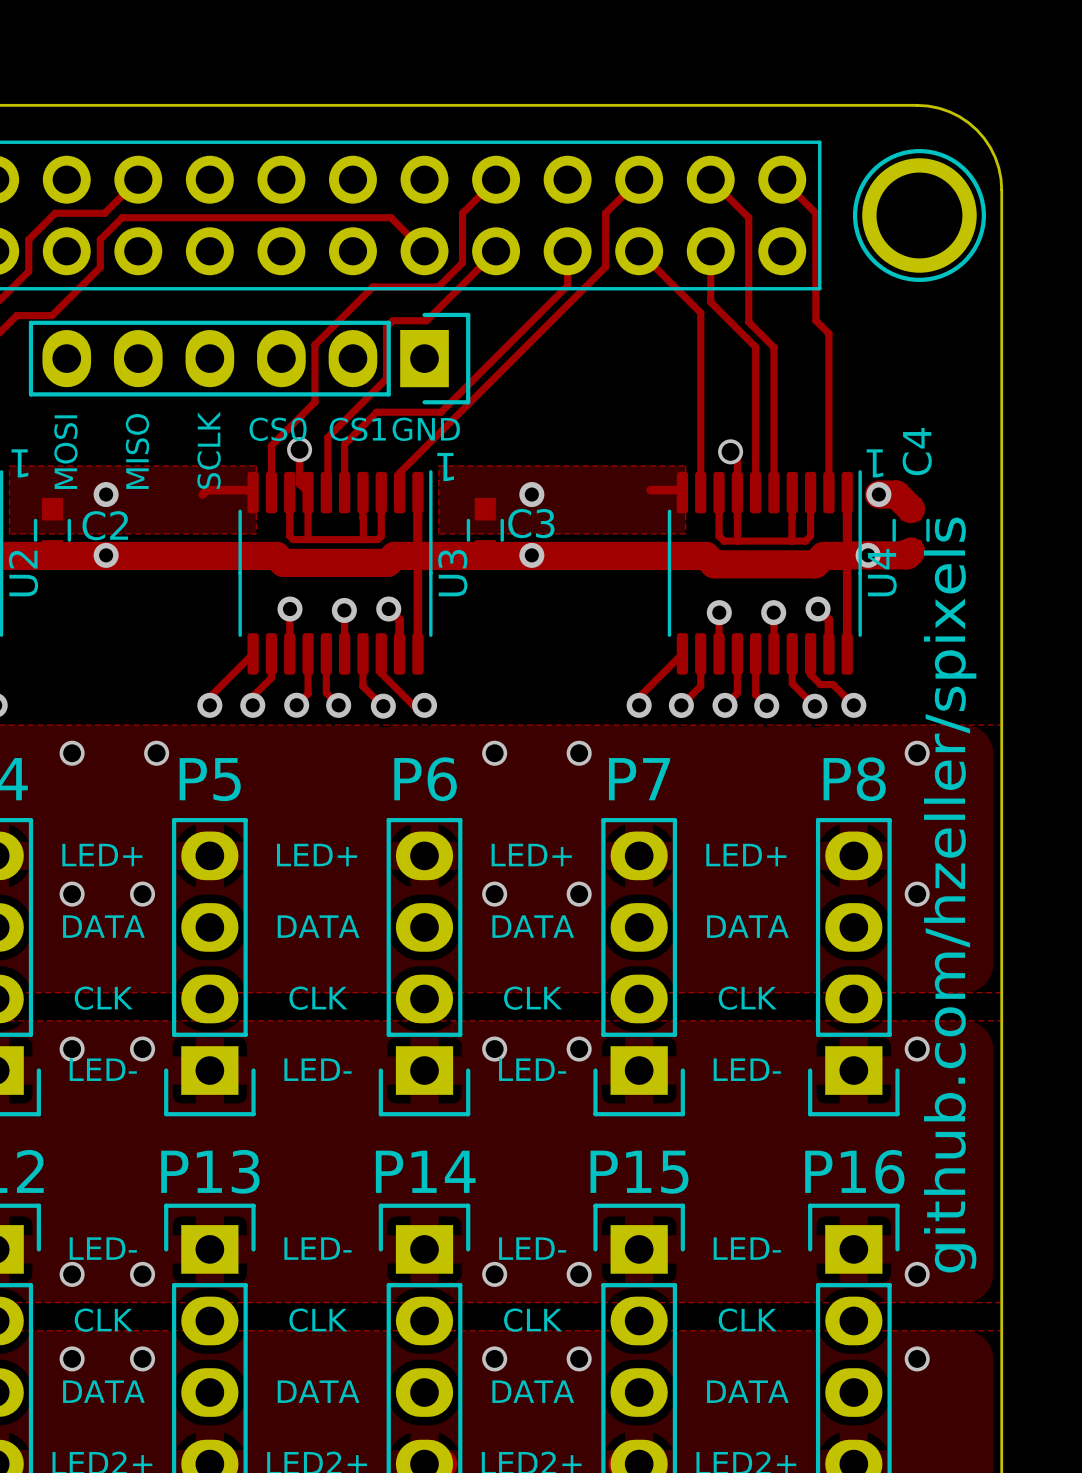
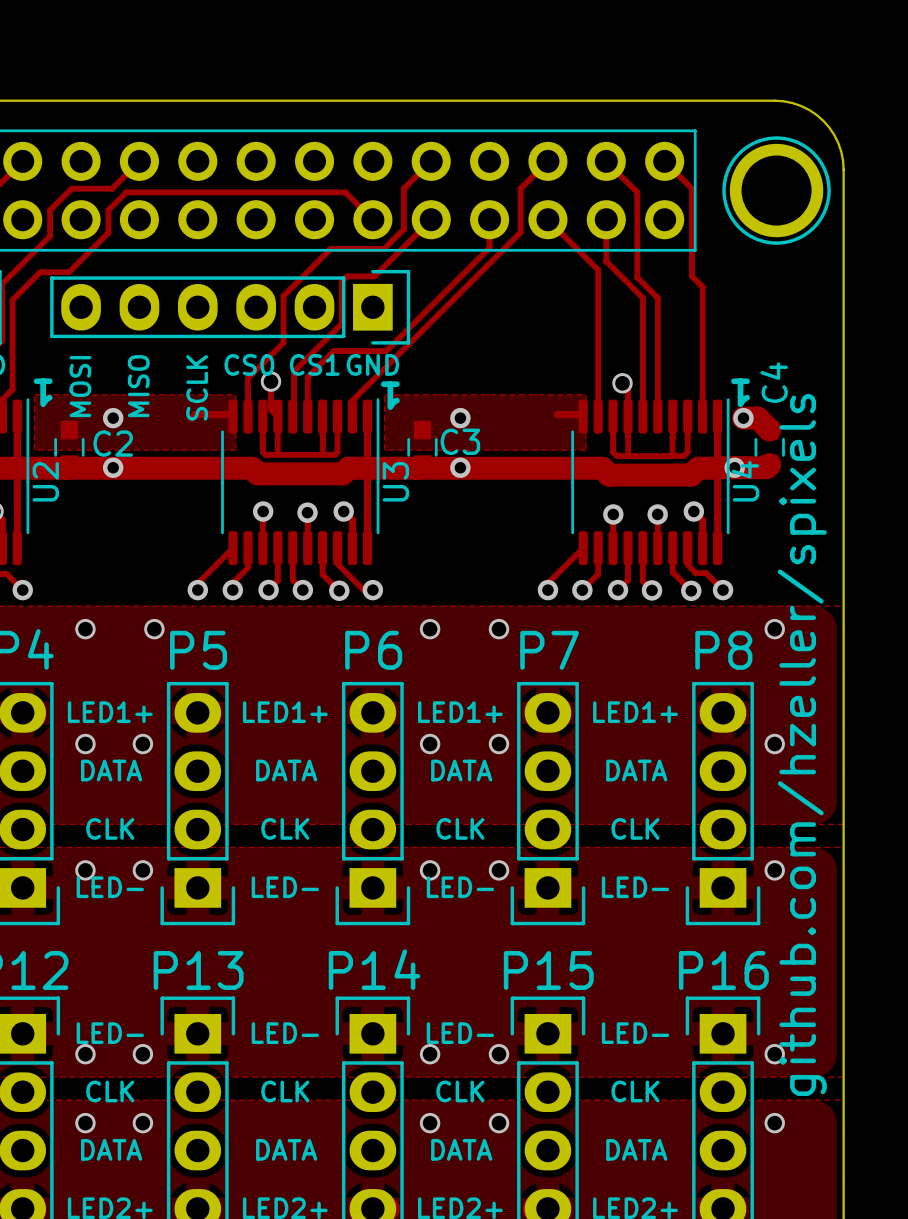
text: LED+ (102, 855) -> LED1+ (110, 712)
text: LED+ (317, 855) -> LED1+ (285, 712)
text: LED+ (531, 855) -> LED1+ (460, 712)
text: LED+ (746, 855) -> LED1+ (635, 712)

